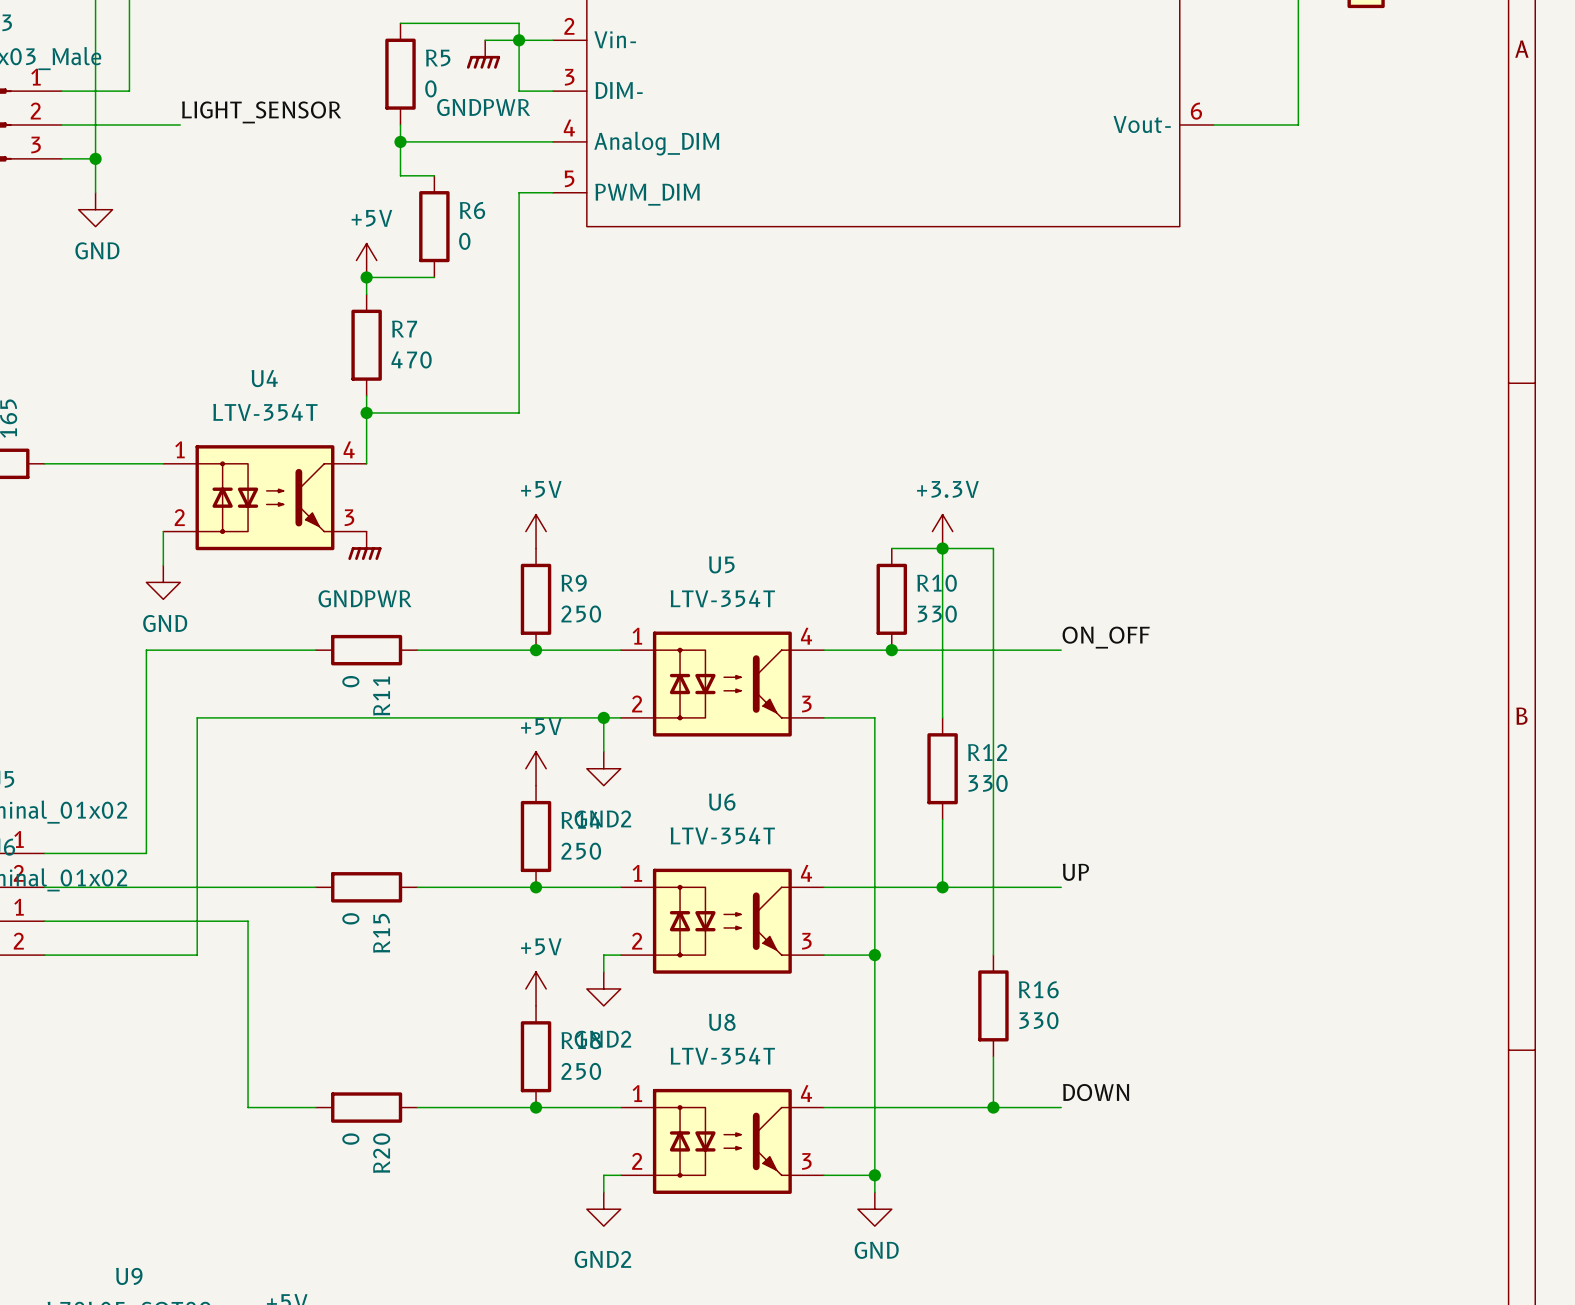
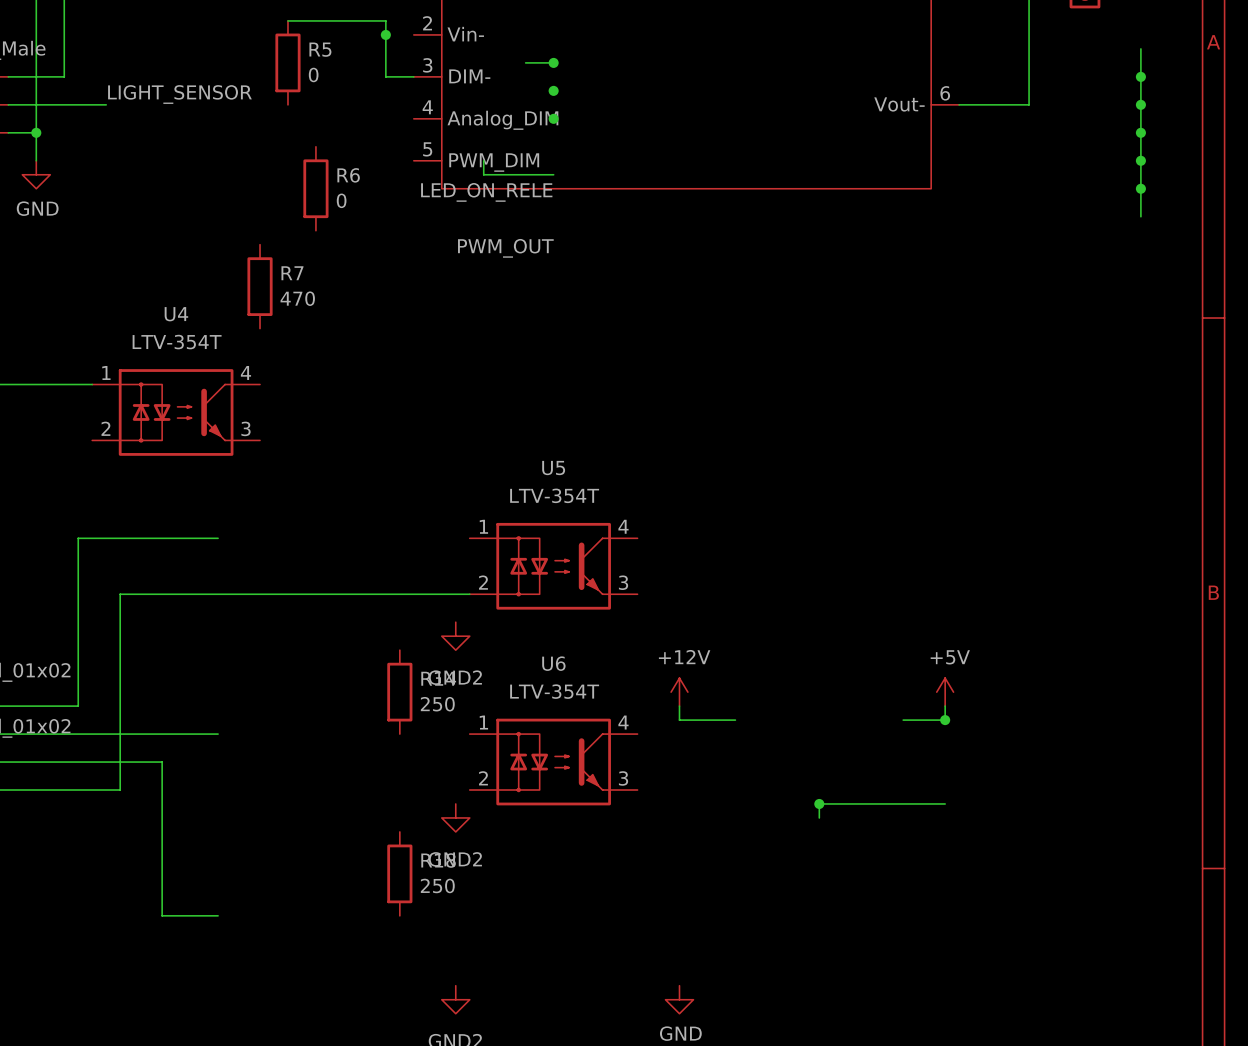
wire: (485, 40) (552, 40) -> none
power symbol: GNDPWR (483, 54) -> none
wire: none -> (1140, 48) (1140, 216)
wire: none -> (525, 62) (553, 62)
junction: none -> (553, 62)
junction: none -> (1140, 76)
junction: none -> (553, 90)
wire: (400, 124) (400, 175) (434, 175) -> none
junction: none -> (1140, 104)
wire: (400, 141) (552, 141) -> none
junction: (400, 141) -> none
junction: none -> (553, 118)
junction: none -> (1140, 132)
wire: (552, 192) (519, 192) (519, 412) (366, 412) -> none
wire: none -> (483, 160) (483, 174) (553, 174)
junction: none -> (1140, 160)
junction: none -> (1140, 188)
label: none -> LED_ON_RELE (486, 192)
power symbol: +5V (366, 260) -> none
junction: (366, 277) -> none
wire: (434, 277) (366, 277) (366, 294) -> none
label: none -> PWM_OUT (505, 248)
wire: (366, 396) (366, 463) -> none
junction: (366, 412) -> none
wire: (163, 531) (163, 565) -> none
power symbol: +5V (536, 531) -> none
power symbol: +3.3V (942, 531) -> none
power symbol: GNDPWR (364, 545) -> none
wire: (891, 548) (993, 548) (993, 955) -> none
wire: (942, 548) (942, 717) -> none
junction: (942, 548) -> none
power symbol: GND (163, 582) -> none
R9: 250 (536, 599) -> none
R10: 330 (891, 599) -> none
label: ON_OFF (1106, 637) -> none
R11: 0 (366, 650) -> none
wire: (417, 650) (620, 650) -> none
junction: (536, 650) -> none
wire: (824, 650) (1061, 650) -> none
junction: (891, 650) -> none
wire: (603, 717) (603, 751) -> none
junction: (603, 717) -> none
wire: (824, 717) (874, 717) (874, 853) -> none
power symbol: +5V (536, 768) -> none
R12: 330 (942, 768) -> none
wire: (942, 819) (942, 887) -> none
power symbol: none -> +12V (679, 692)
power symbol: none -> +5V (945, 692)
wire: none -> (945, 706) (945, 720) (903, 720)
wire: (874, 870) (874, 1192) -> (679, 720) (735, 720)
junction: none -> (945, 720)
label: UP (1075, 872) -> none
R15: 0 (366, 887) -> none
wire: (417, 887) (620, 887) -> none
junction: (536, 887) -> none
wire: (824, 887) (1061, 887) -> none
junction: (942, 887) -> none
wire: (620, 955) (603, 955) (603, 972) -> none
wire: (824, 955) (874, 955) -> none
junction: (874, 955) -> none
junction: none -> (819, 803)
wire: none -> (945, 803) (819, 803) (819, 817)
power symbol: +5V (536, 988) -> none
R16: 330 (993, 1005) -> none
wire: (993, 1056) (993, 1107) -> none
label: DOWN (1096, 1092) -> none
R20: 0 (366, 1107) -> none
wire: (417, 1107) (620, 1107) -> none
junction: (536, 1107) -> none
wire: (824, 1107) (1061, 1107) -> none
junction: (993, 1107) -> none
U8: LTV-354T (722, 1141) -> none
wire: (620, 1175) (603, 1175) (603, 1192) -> none
wire: (824, 1175) (874, 1175) -> none
junction: (874, 1175) -> none

